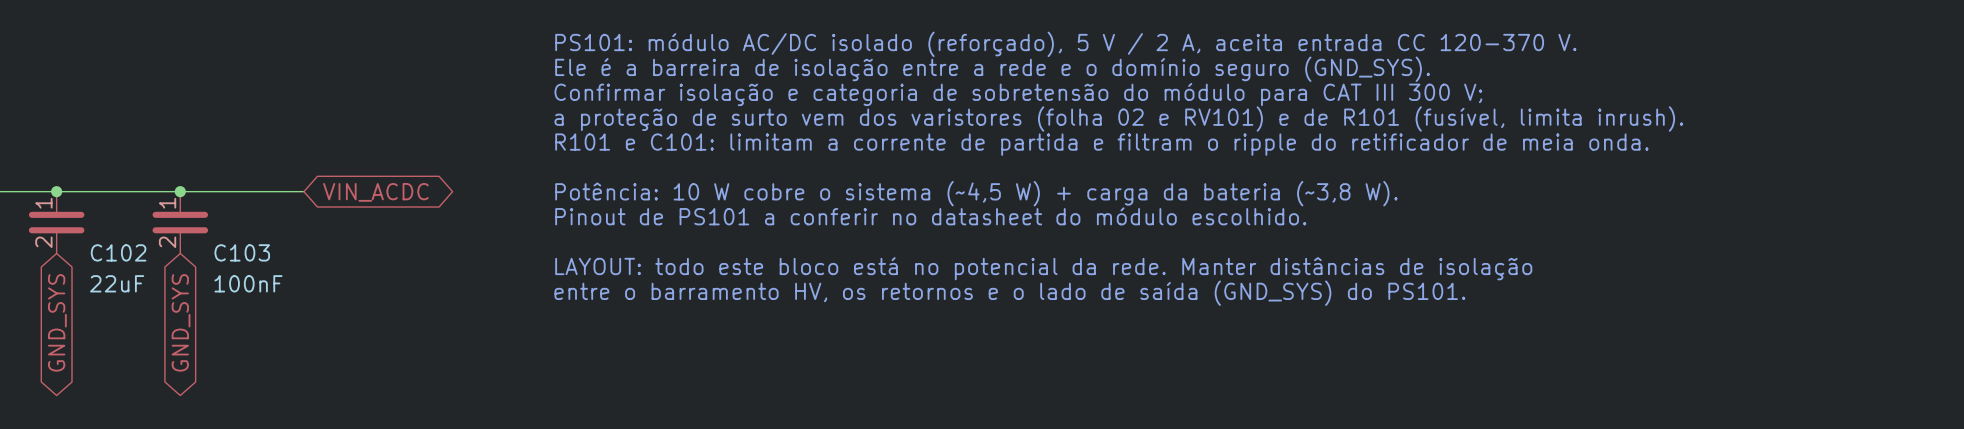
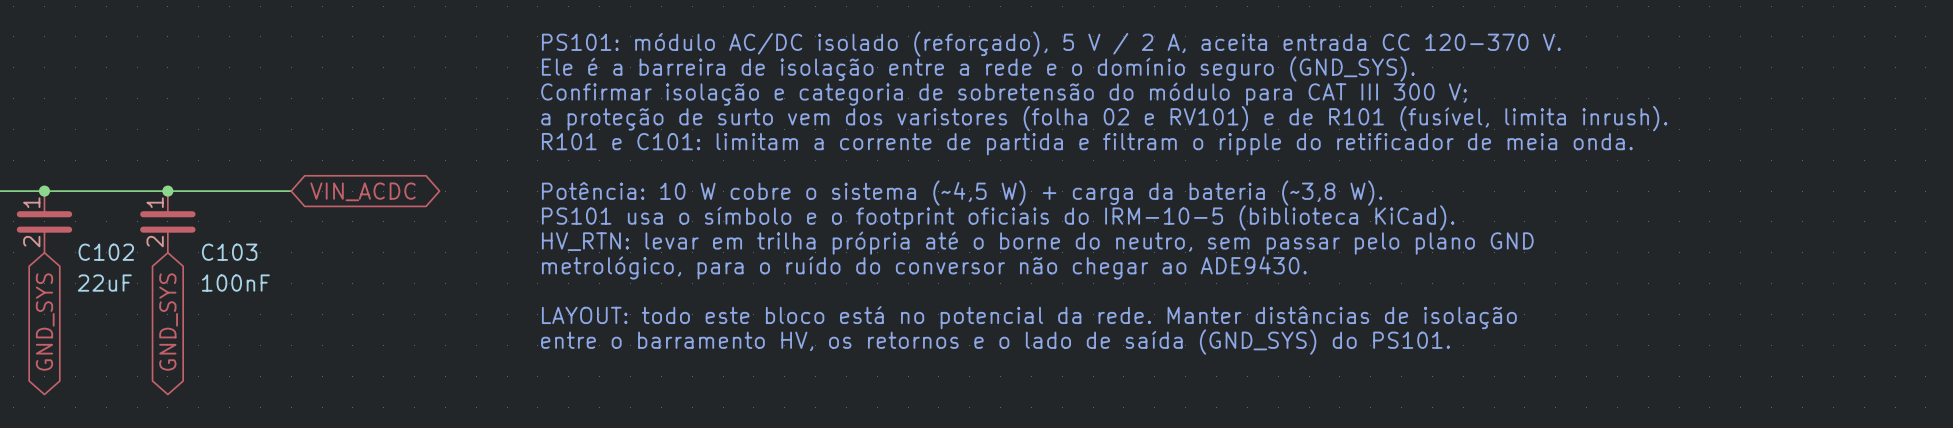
text: Pinout de PS101 a conferir no datasheet do módulo escolhido. (930, 216) -> PS101 usa o símbolo e o footprint oficiais do IRM-10-5 (biblioteca KiCad). (998, 217)
text: none -> HV_RTN: levar em trilha própria até o borne do neutro, sem passar pelo plano GND (1037, 243)
text: LAYOUT: todo este bloco está no potencial da rede. Manter distâncias de isolação (1043, 268) -> metrológico, para o ruído do conversor não chegar ao ADE9430. (924, 267)
text position: entre o barramento HV, os retornos e o lado de saída (GND_SYS) do PS101. (1009, 293) -> entre o barramento HV, os retornos e o lado de saída (GND_SYS) do PS101. (995, 342)
text: none -> LAYOUT: todo este bloco está no potencial da rede. Manter distâncias de isolação (1029, 317)

